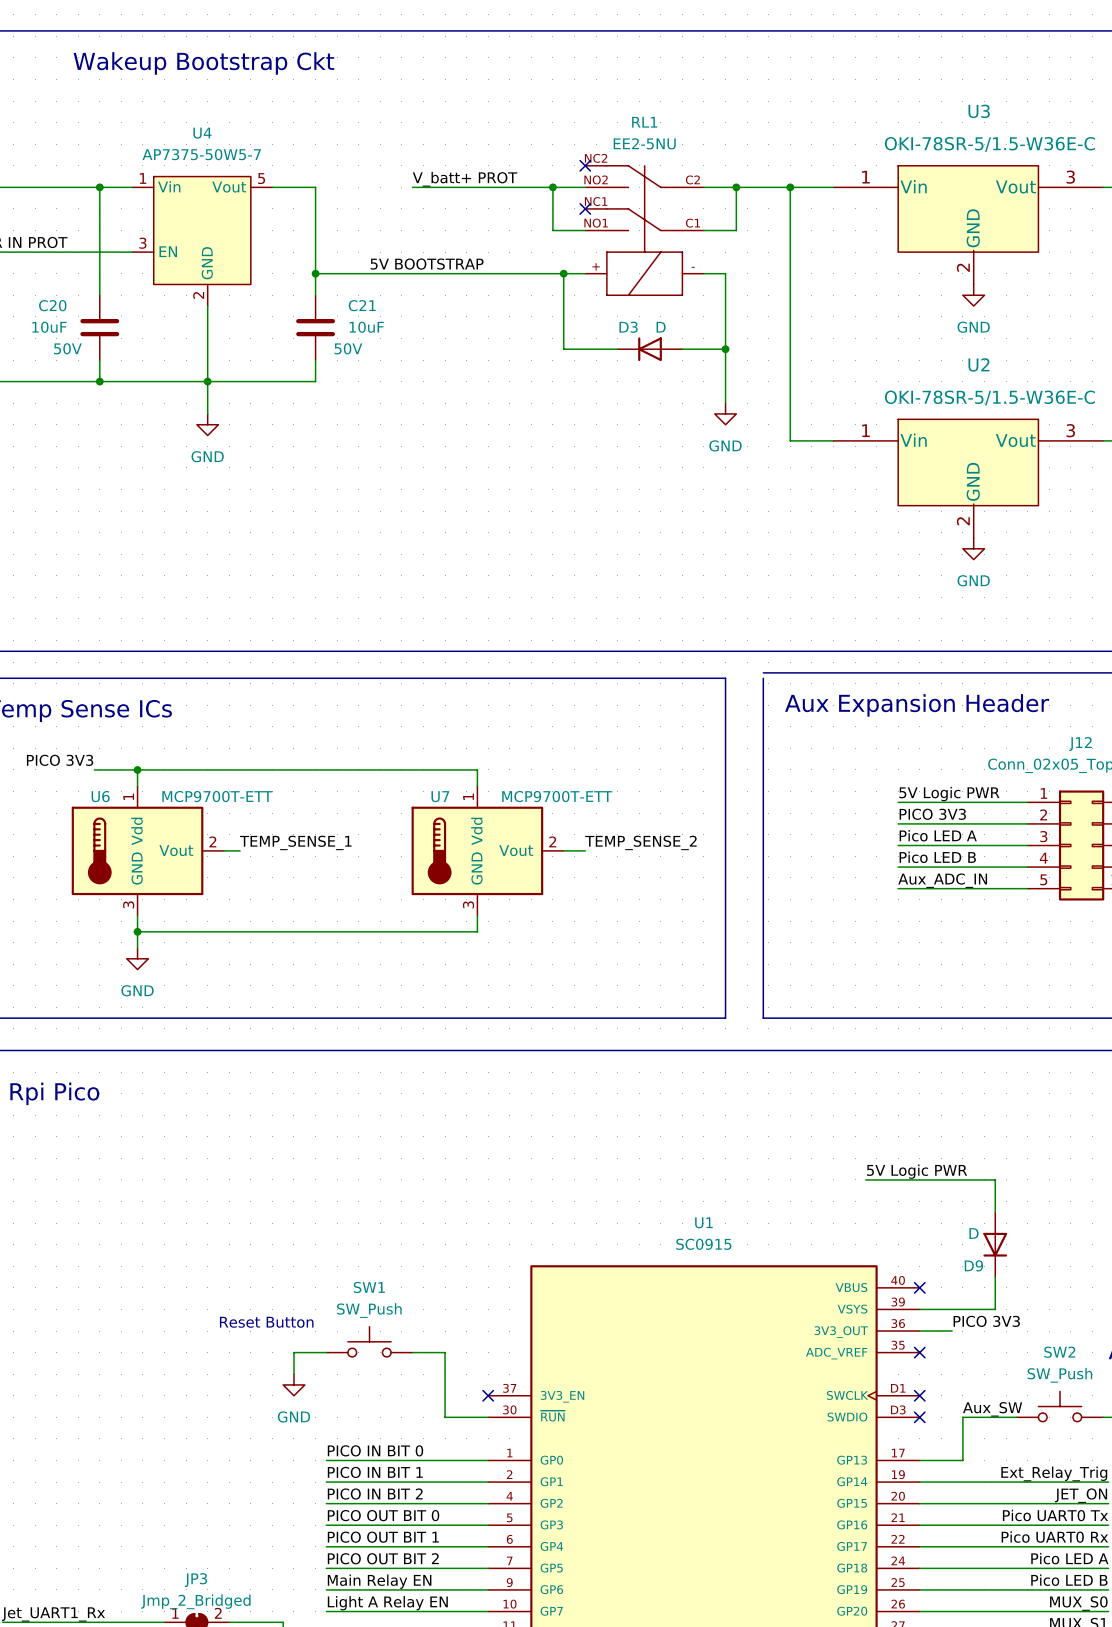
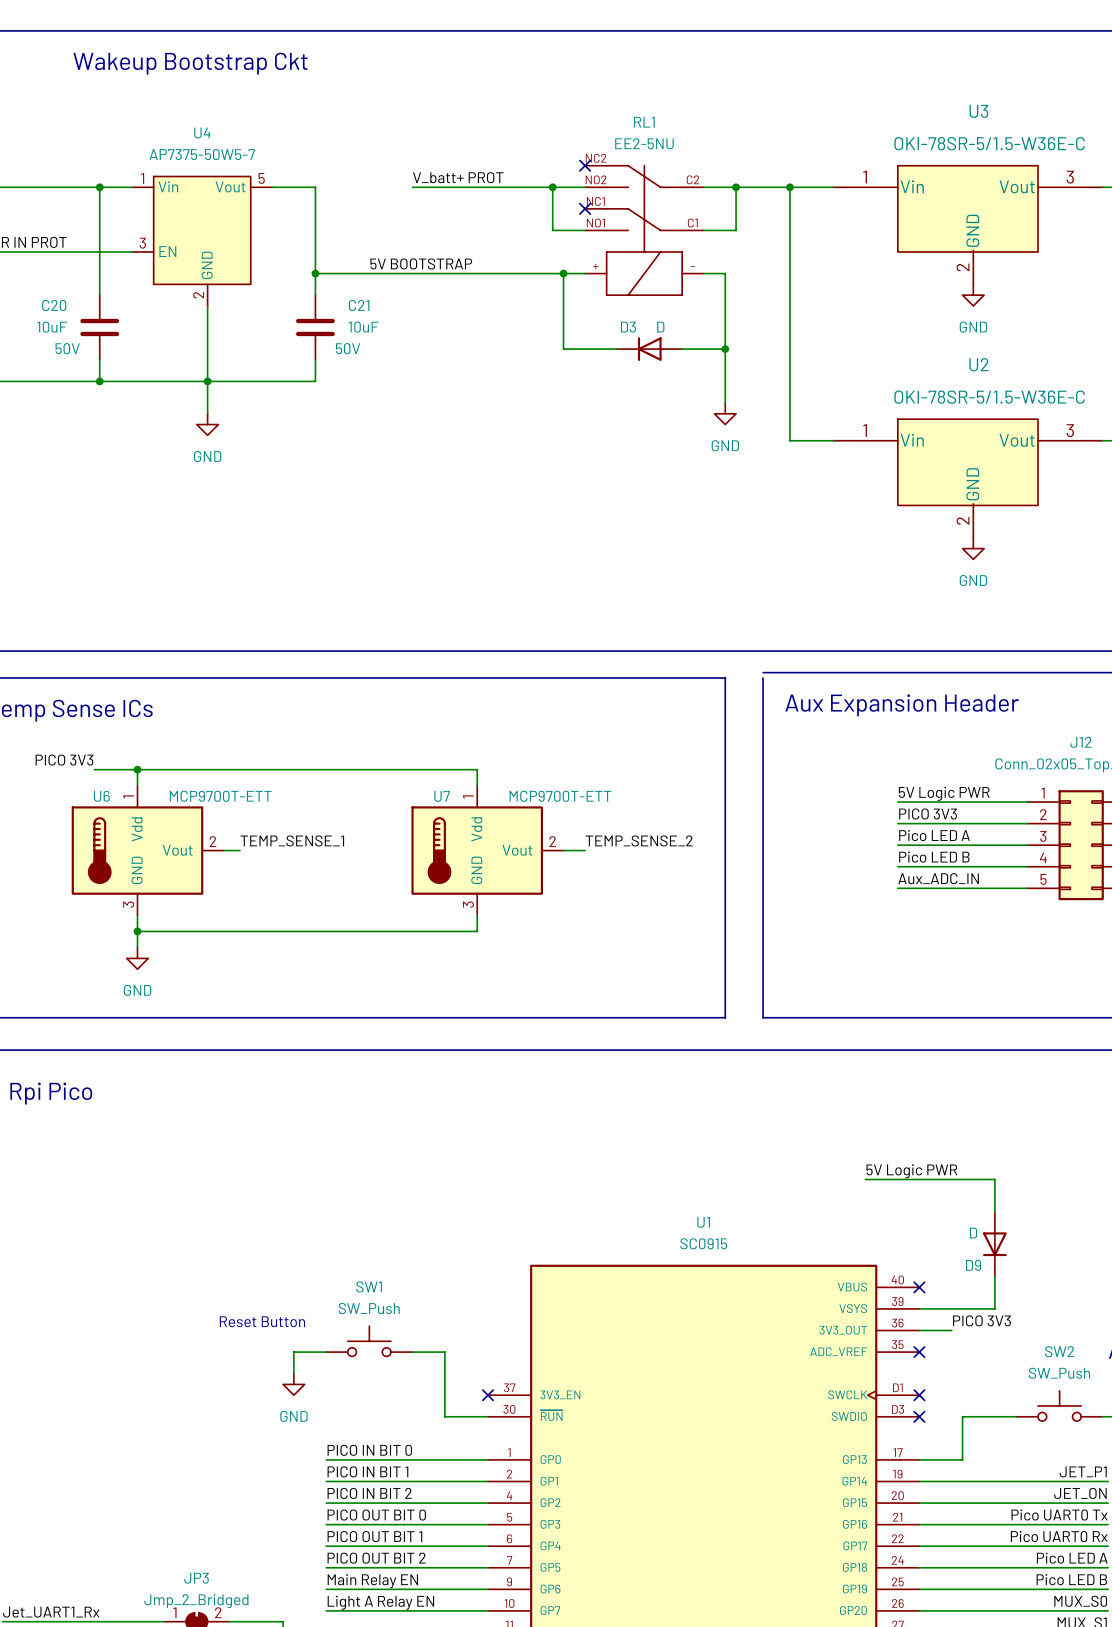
label: Aux_SW (992, 1409) -> none
label: Ext_Relay_Trig (1054, 1473) -> JET_P1 (1083, 1471)

